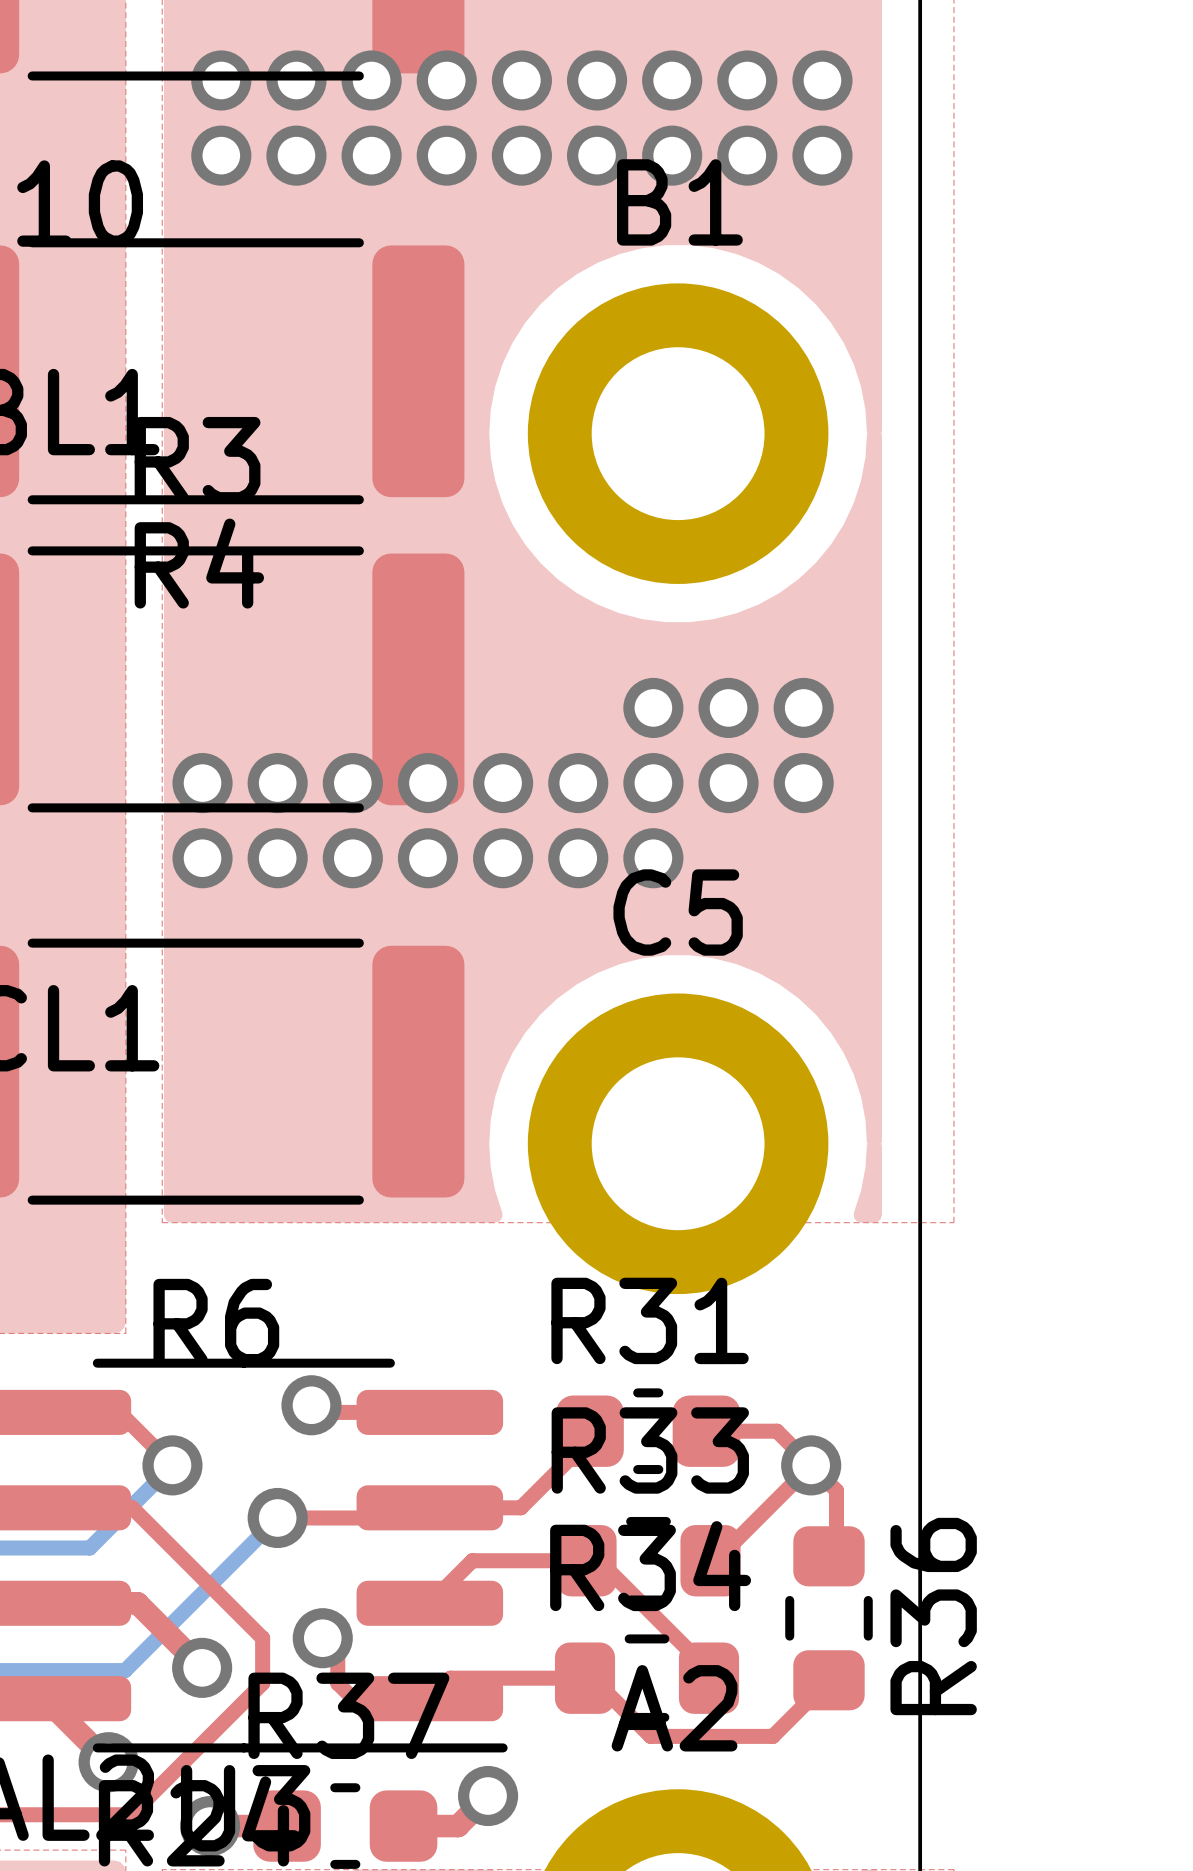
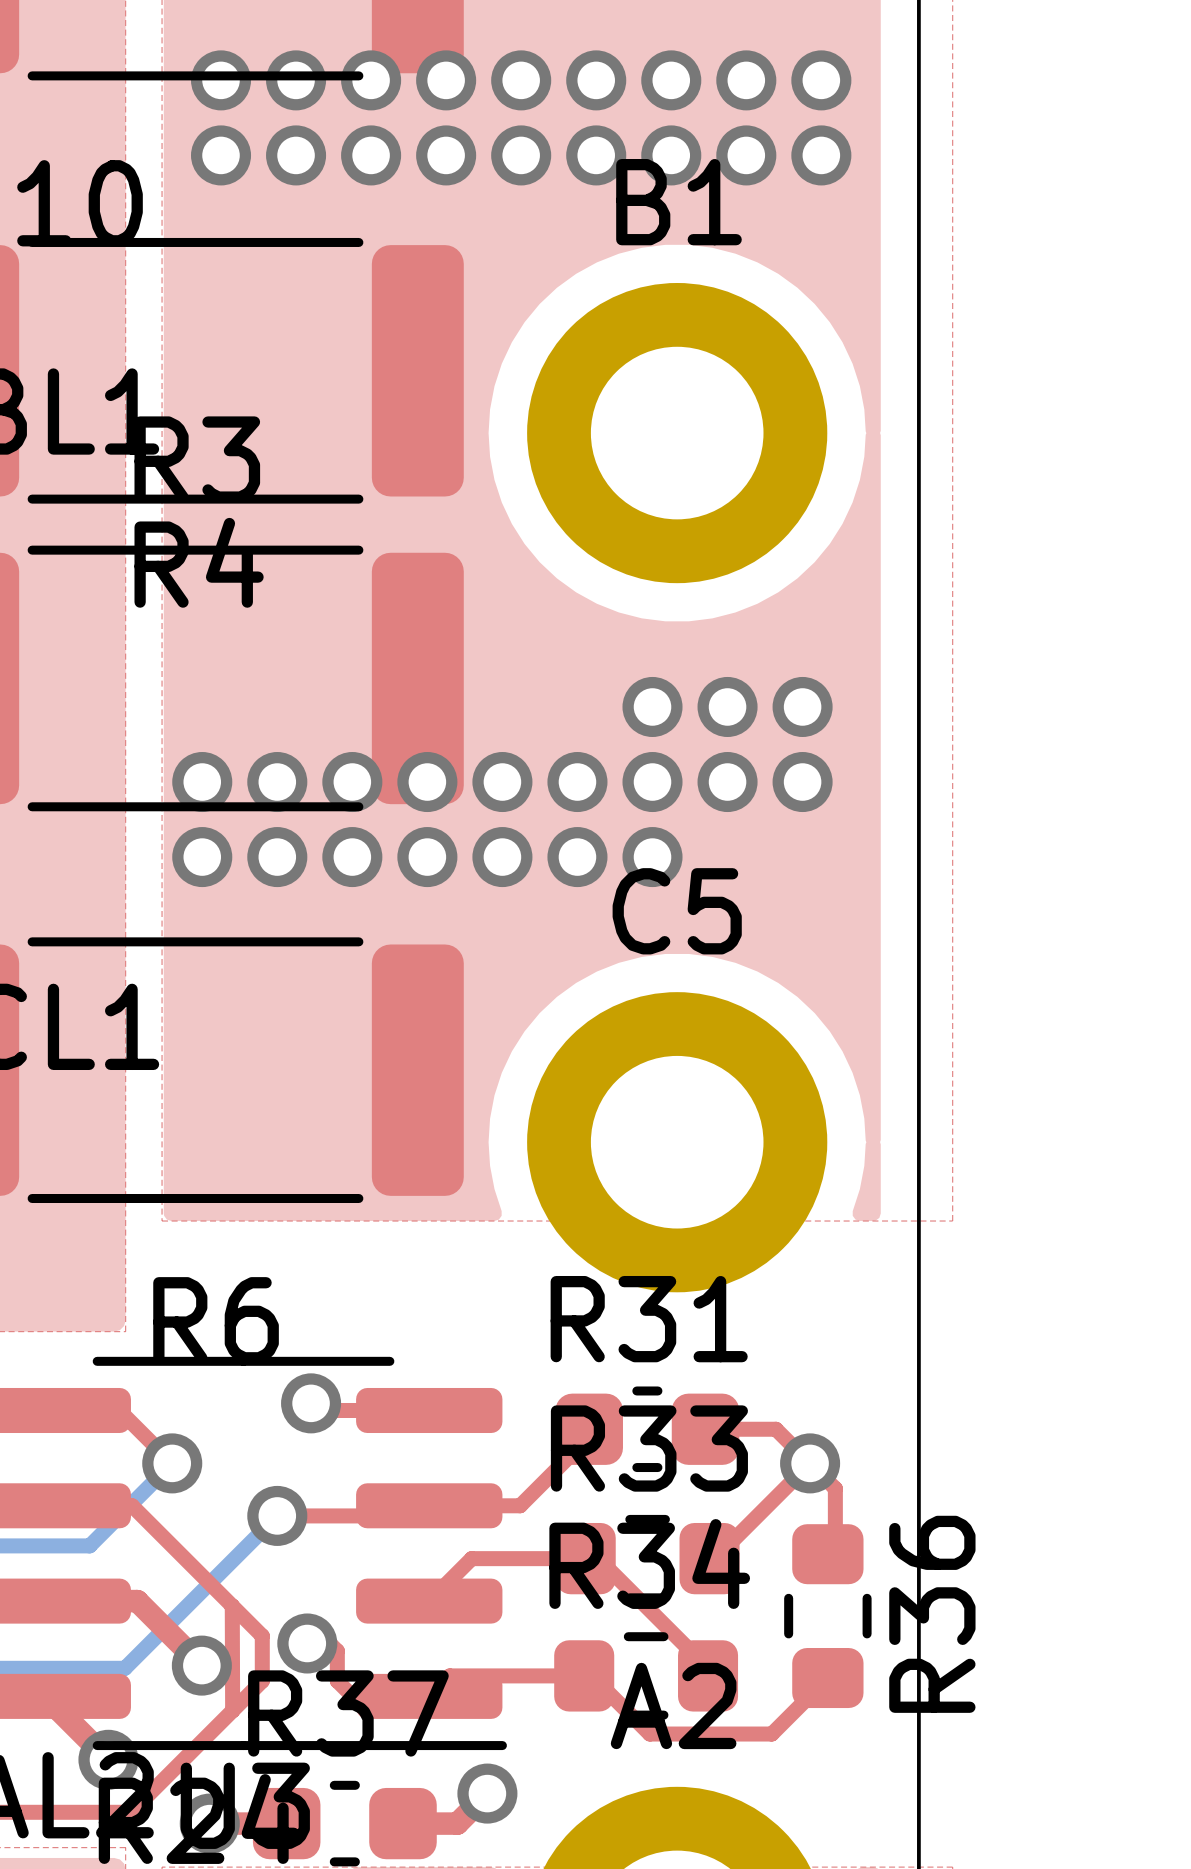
top track: none -> (232, 1605) (232, 1710)
via position: (322, 1638) -> (307, 1643)

